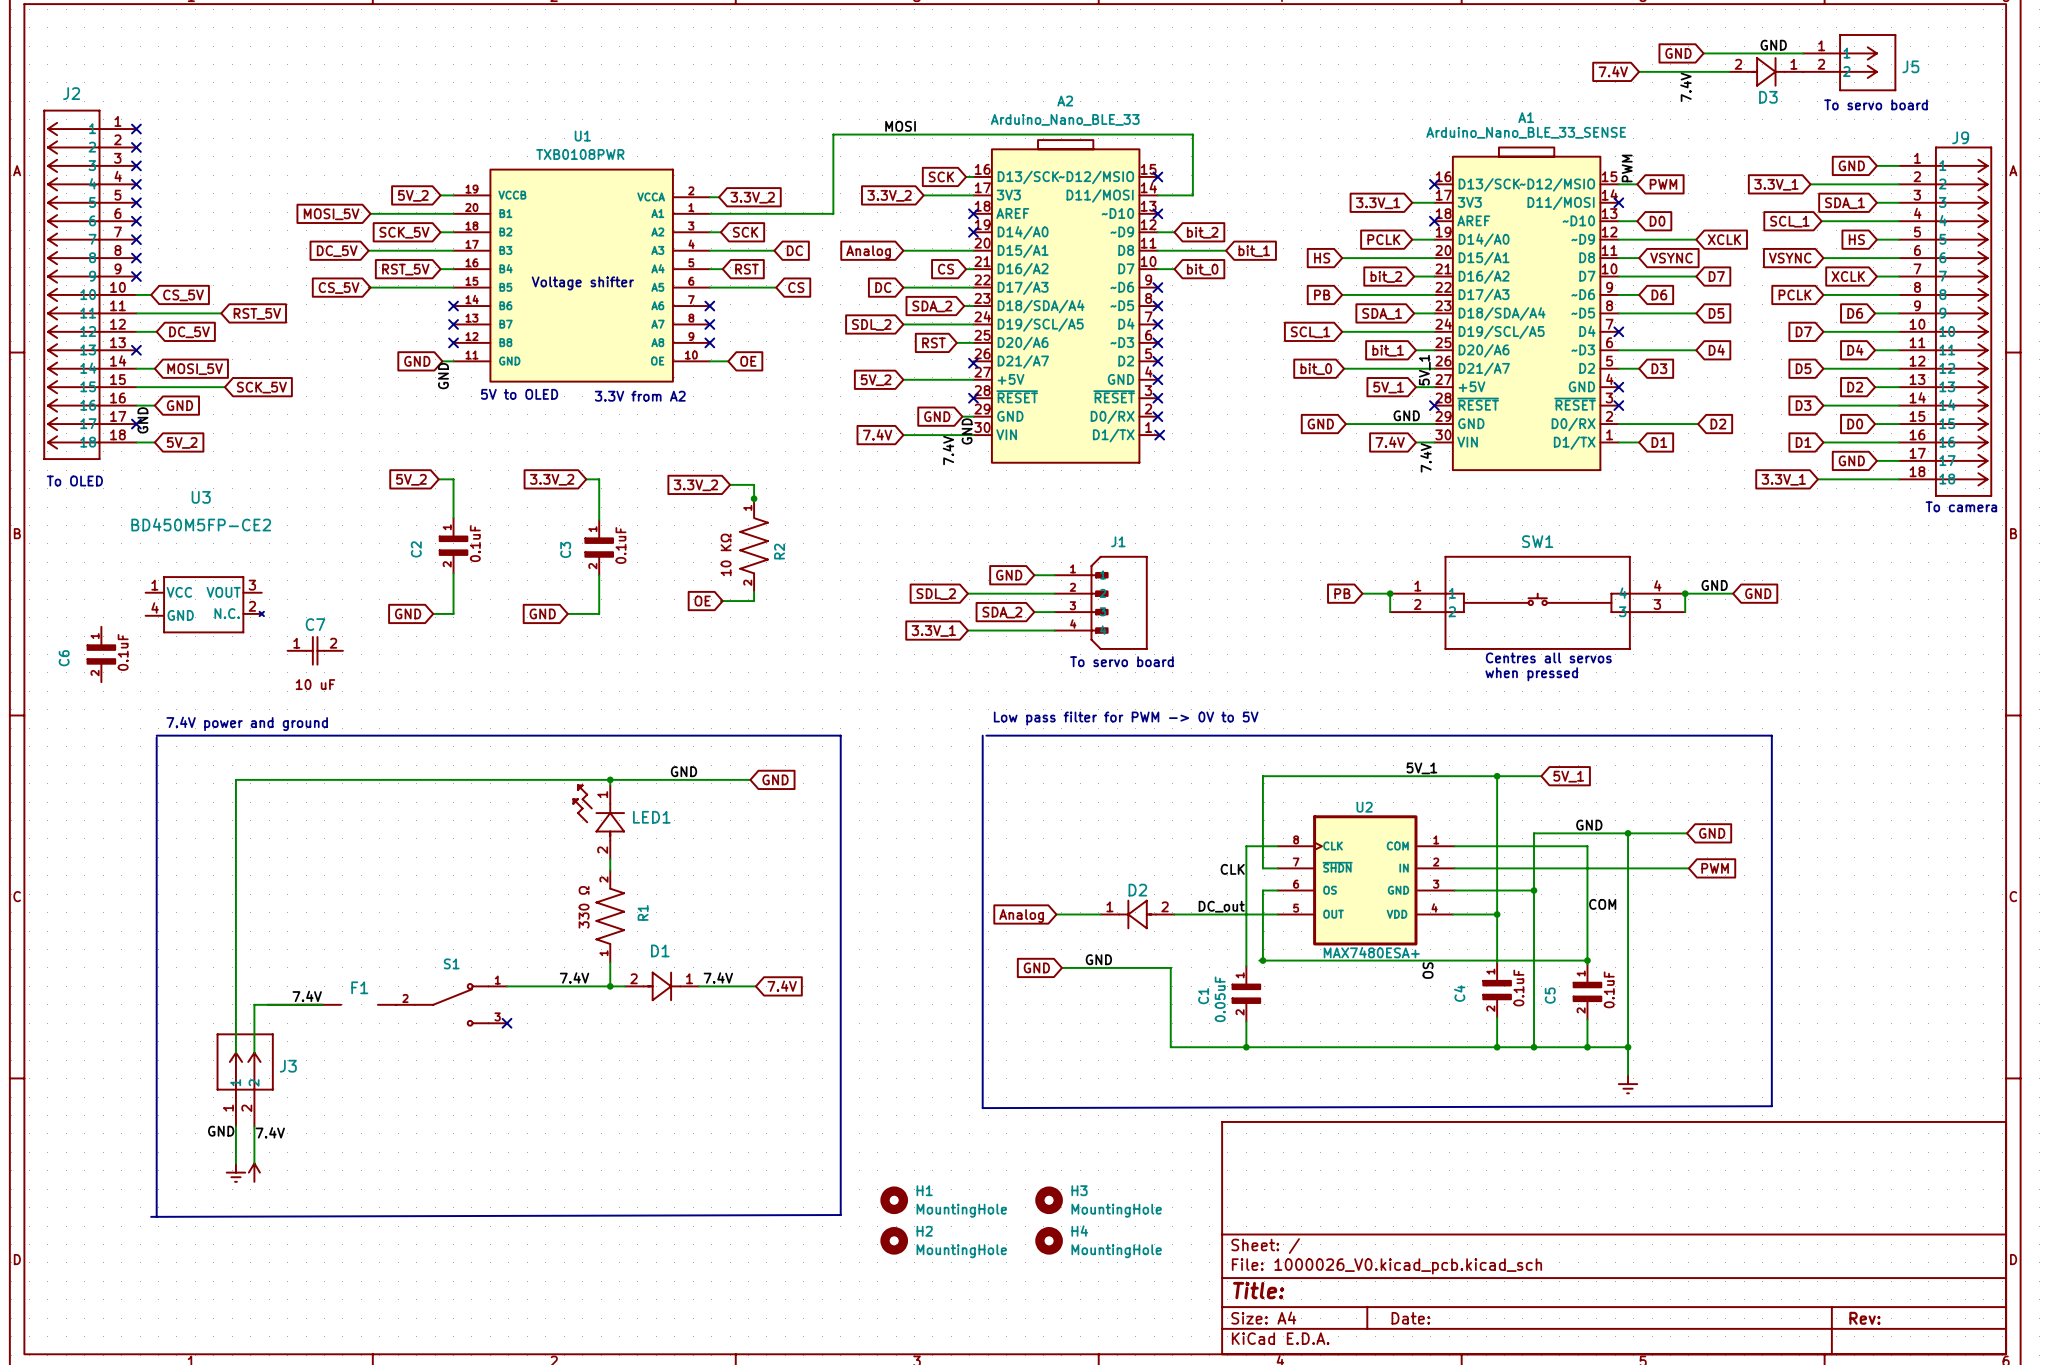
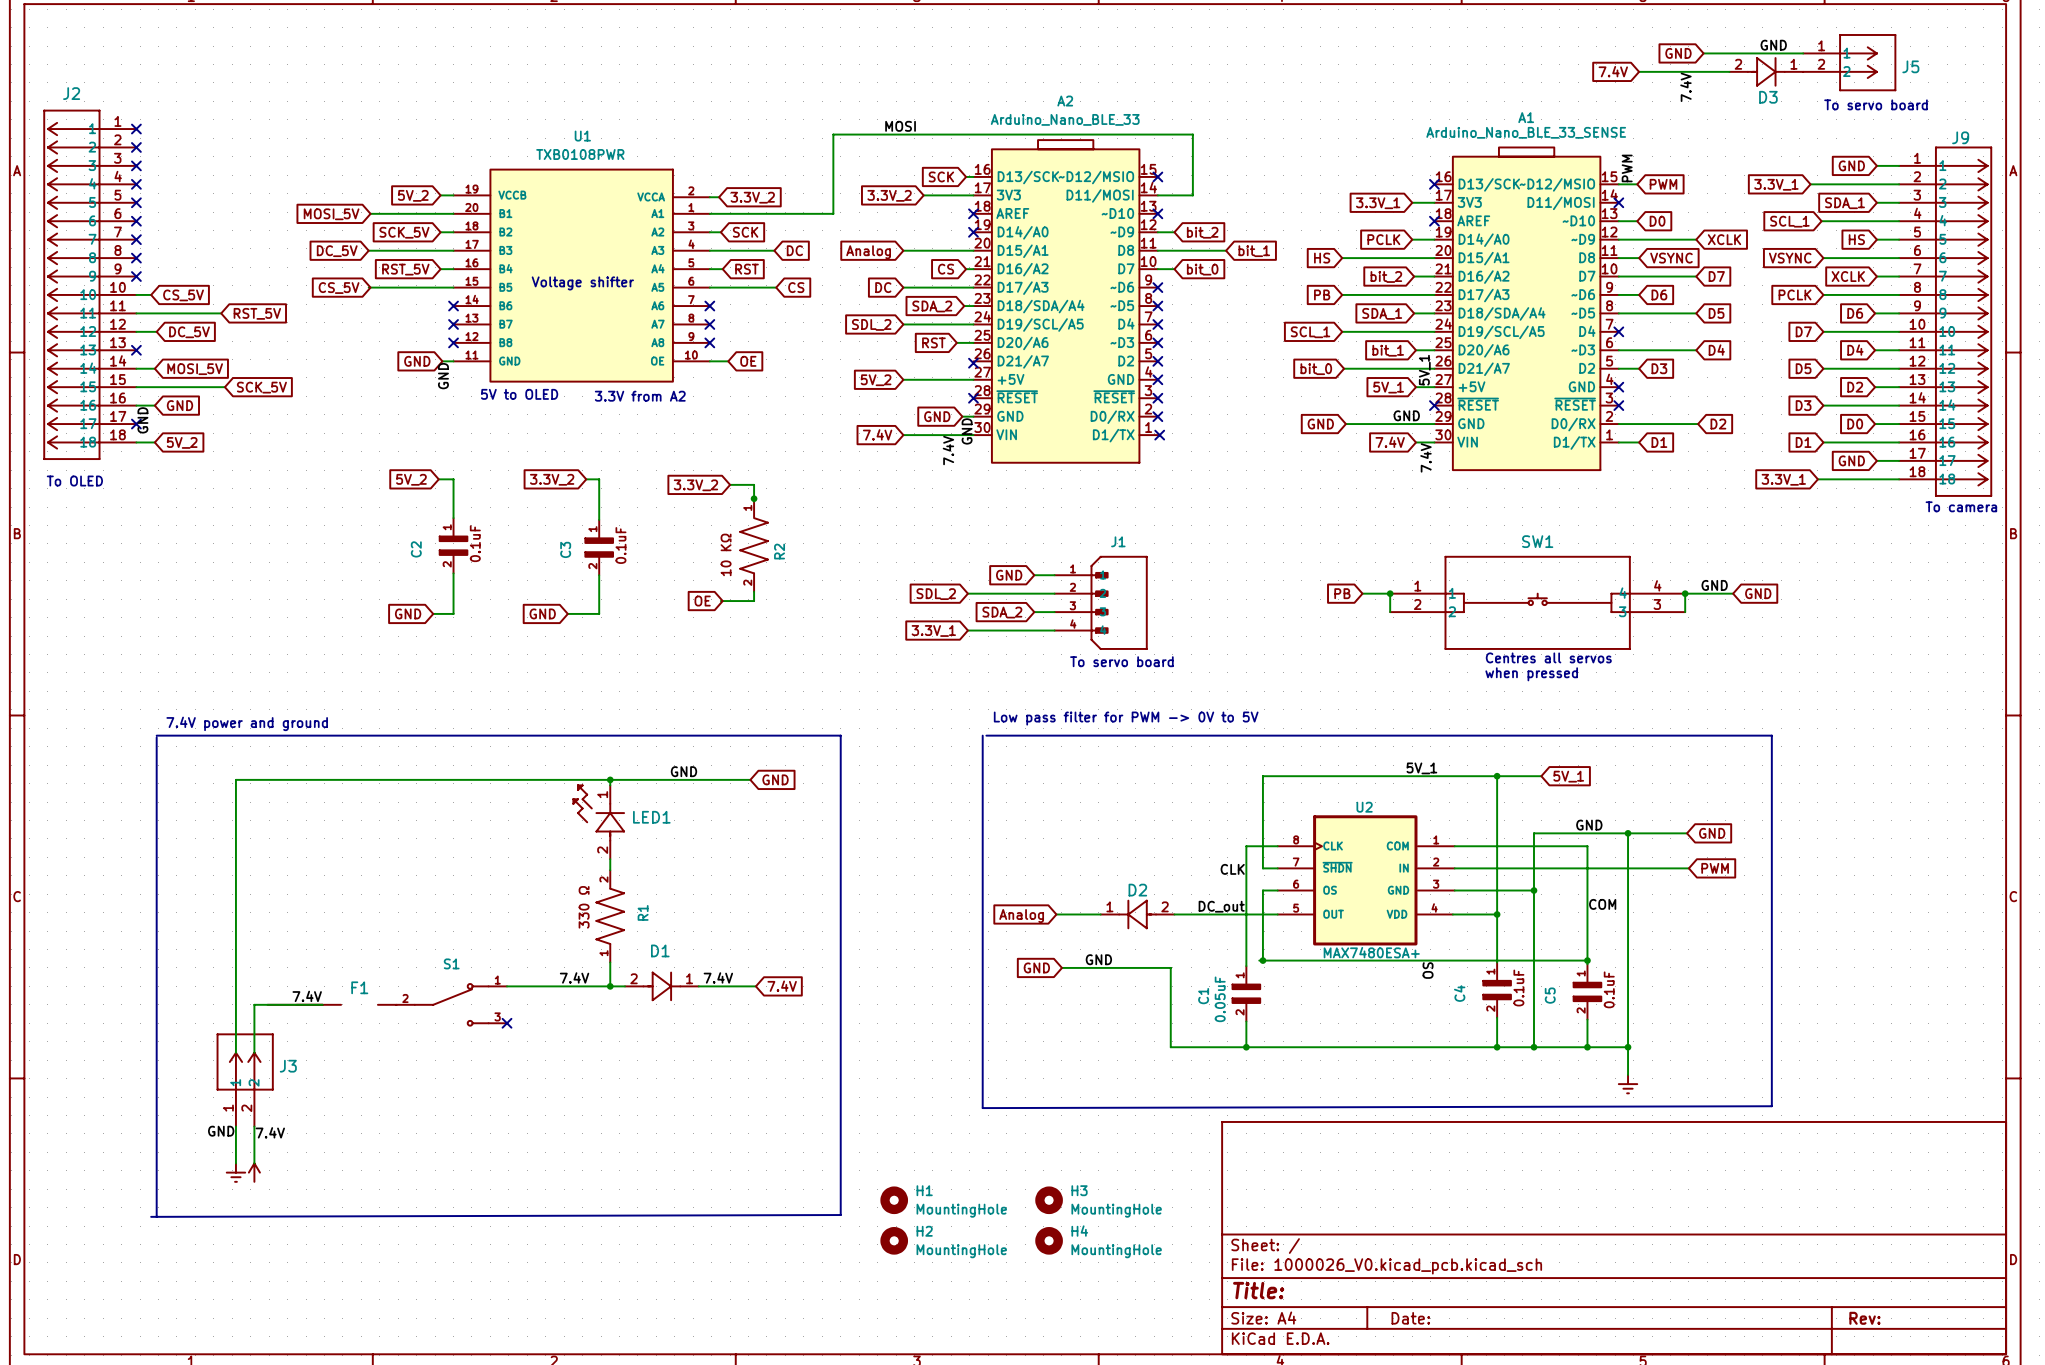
U3: BD450M5FP-CE2 (204, 604) -> none
C7: (315, 650) -> none
C6: (101, 654) -> none

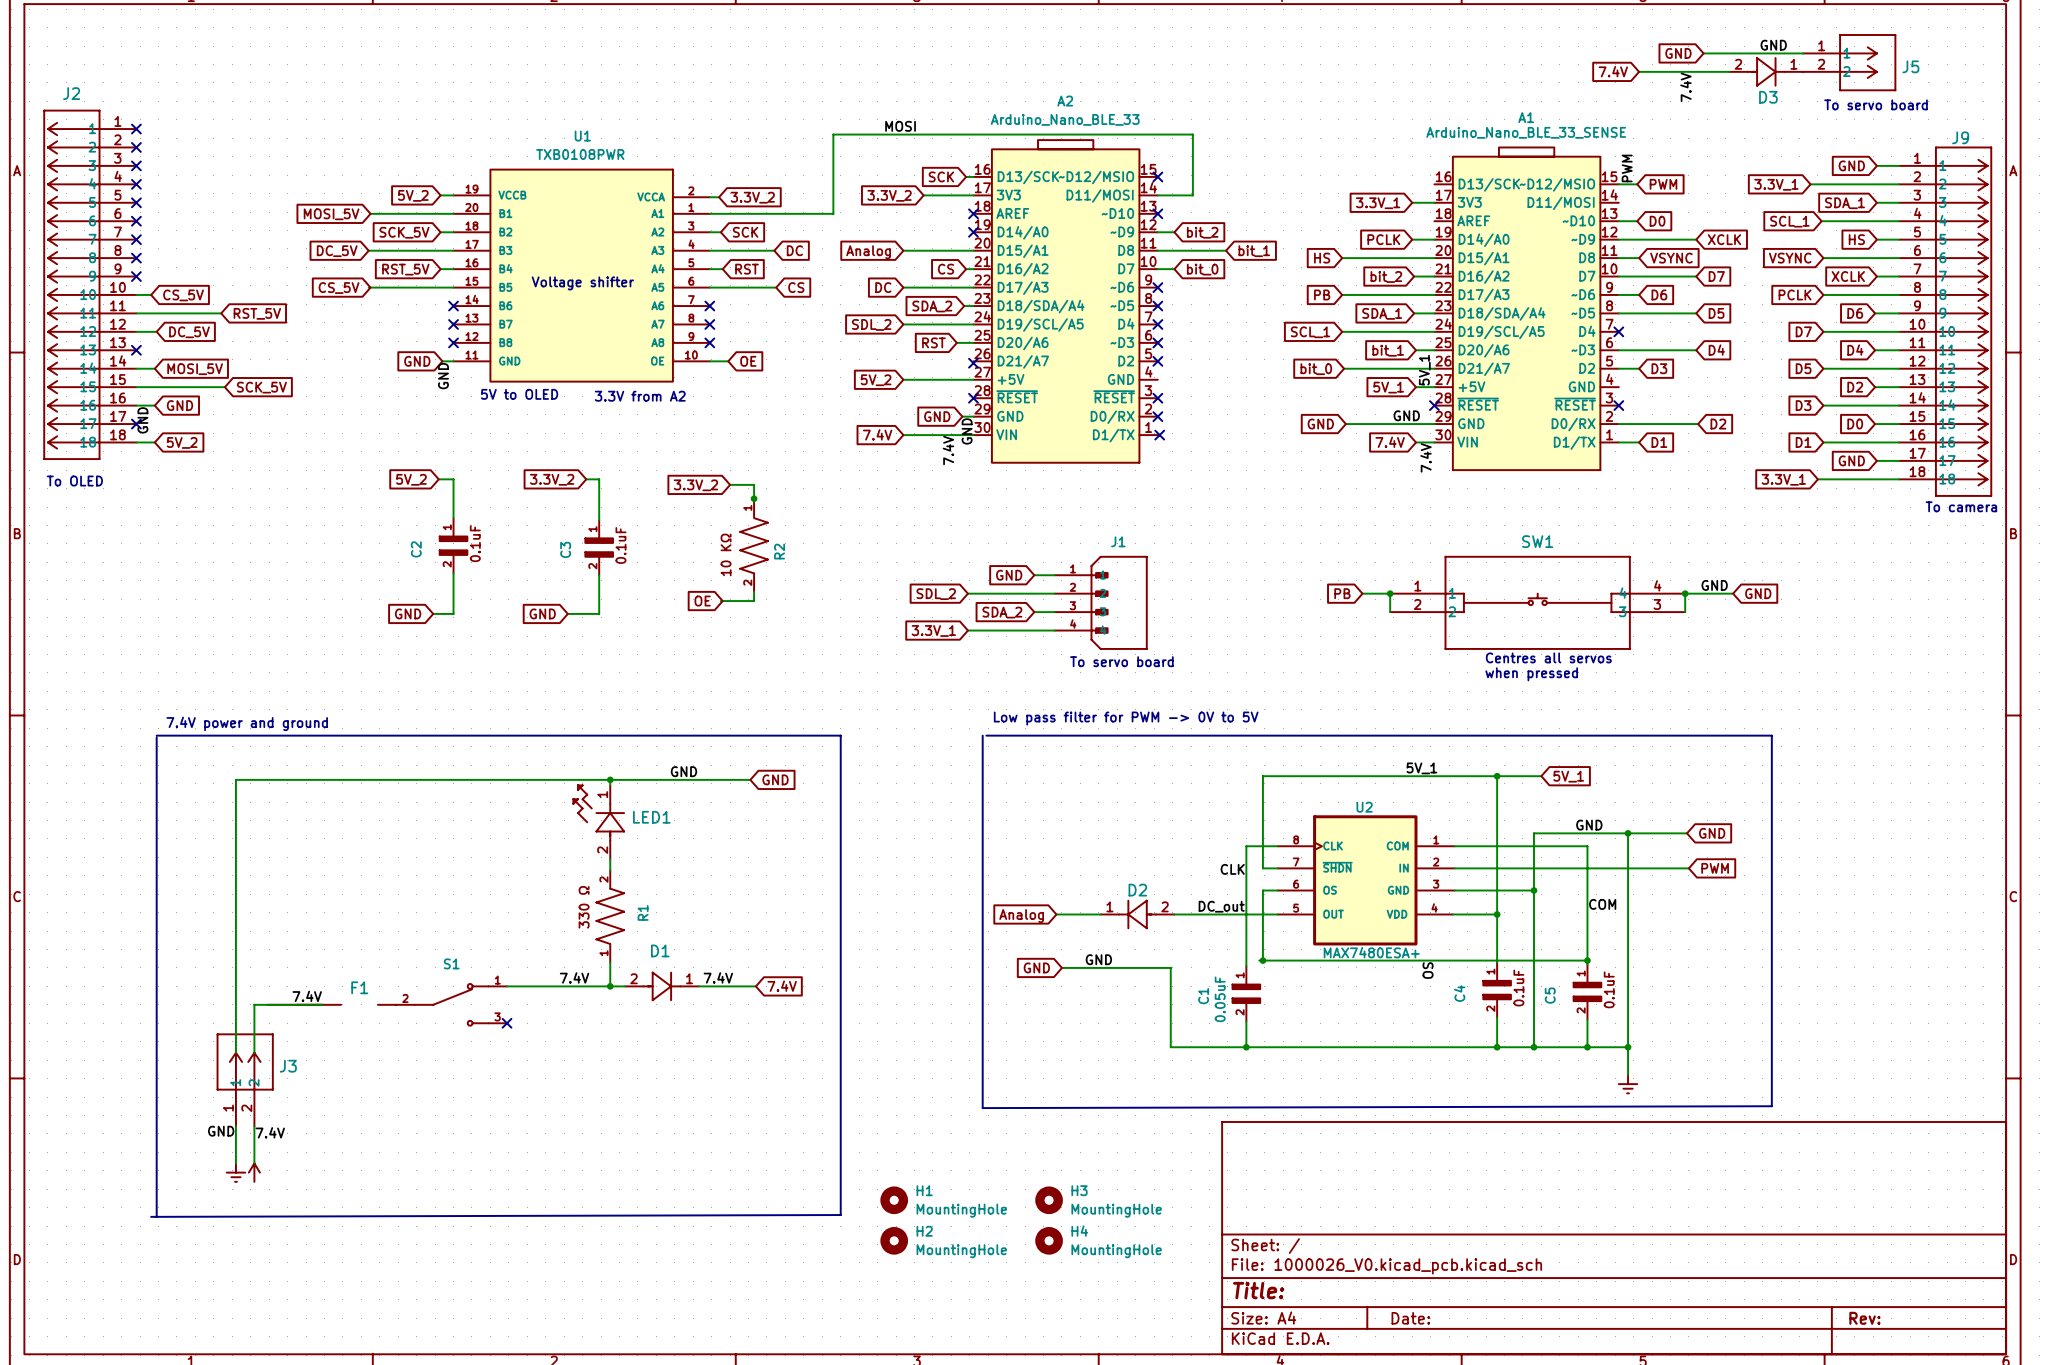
no-connect mark: (1434, 184) -> none
no-connect mark: (1618, 202) -> none
no-connect mark: (1434, 221) -> none
no-connect mark: (1157, 379) -> none
no-connect mark: (1618, 387) -> none

